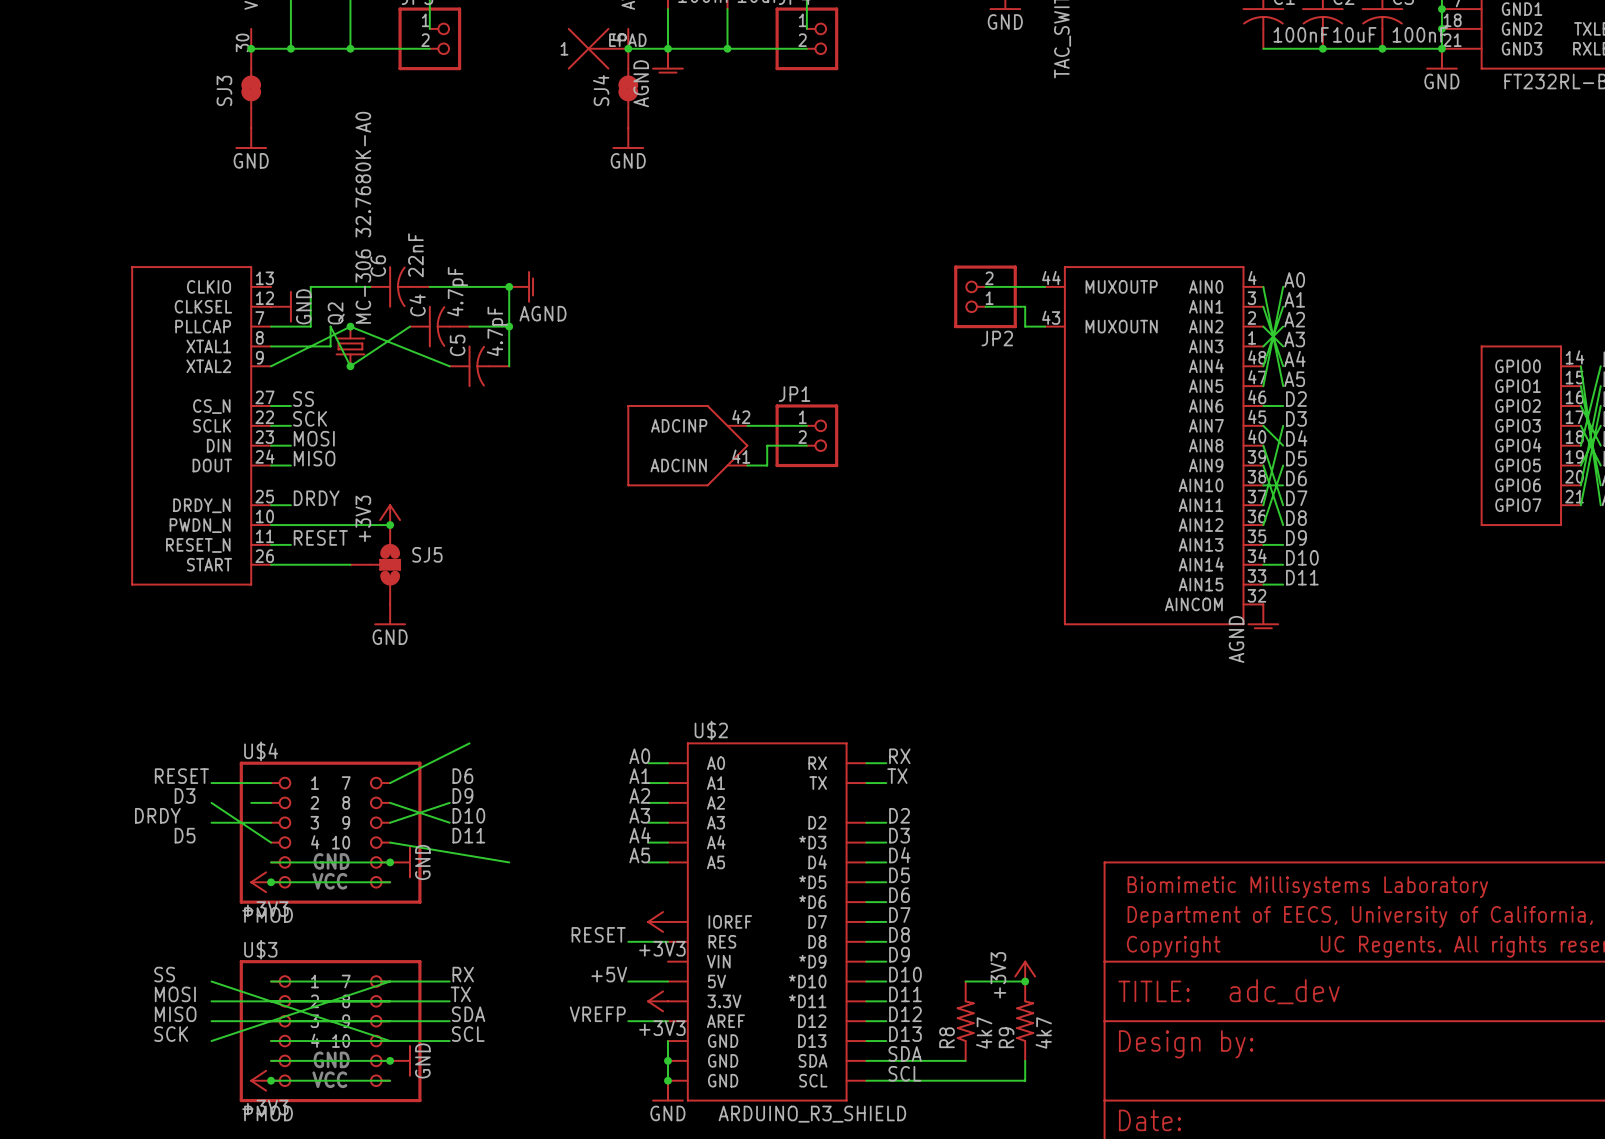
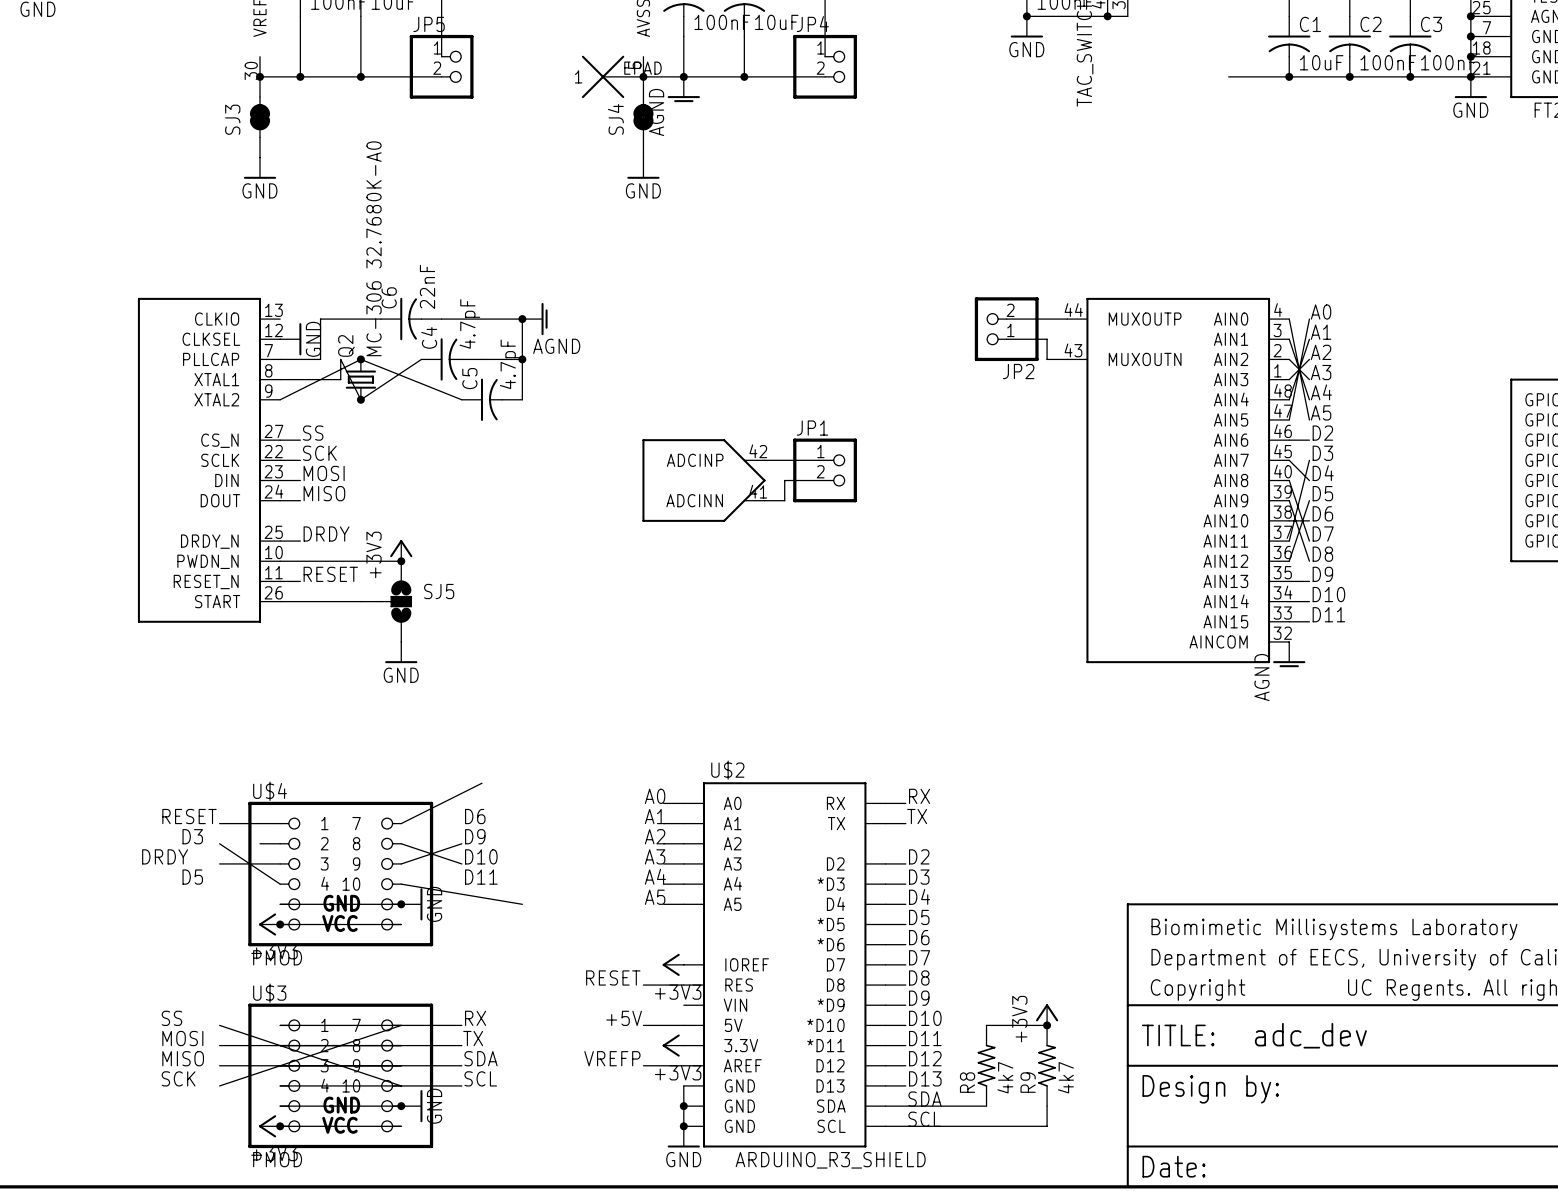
C1 value: 100nF (1301, 34) -> 10uF (1321, 62)
C2 value: 10uF (1354, 34) -> 100nF (1388, 62)
wire: none -> (1228, 76) (1289, 76)
junction: none -> (1289, 76)

